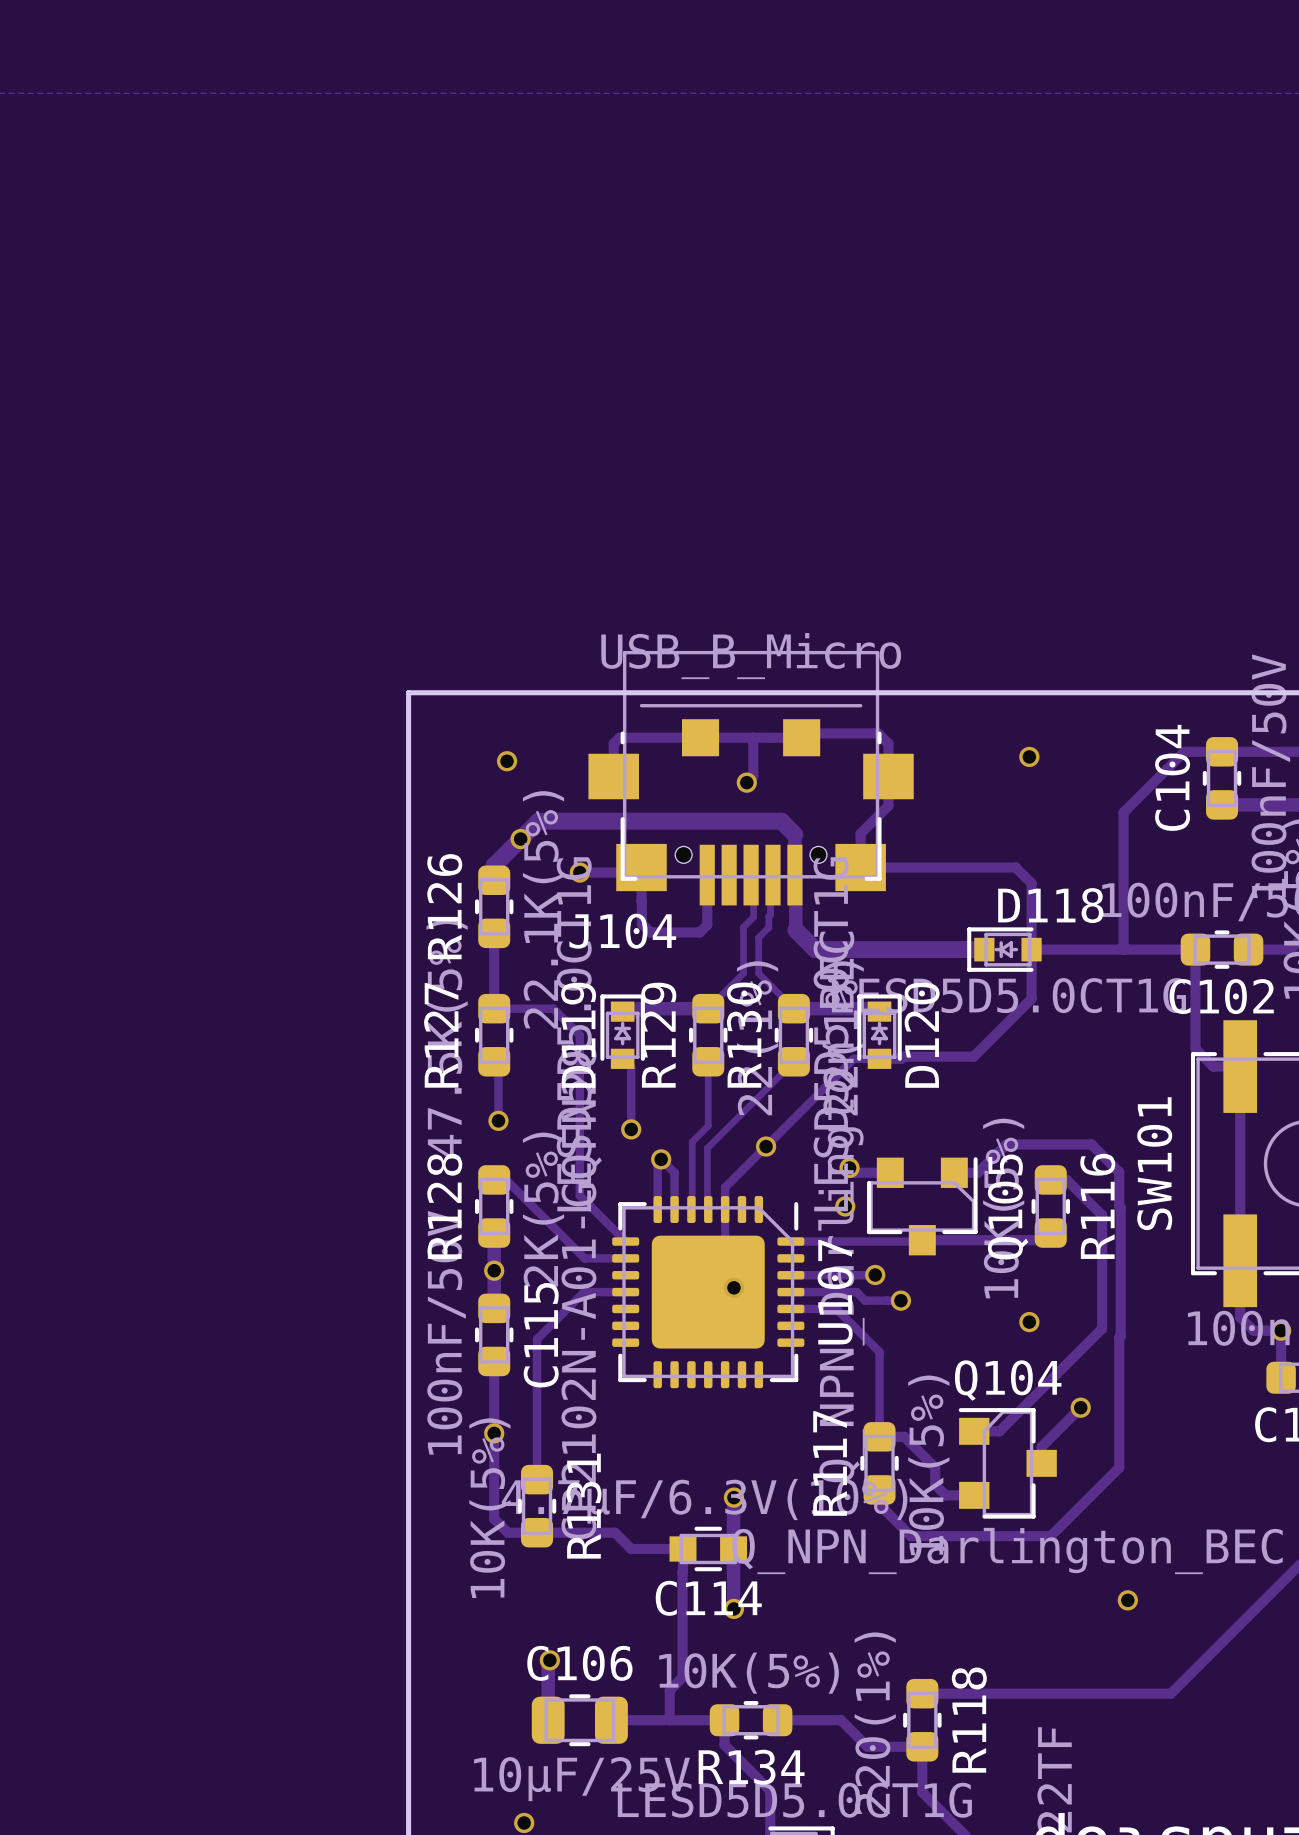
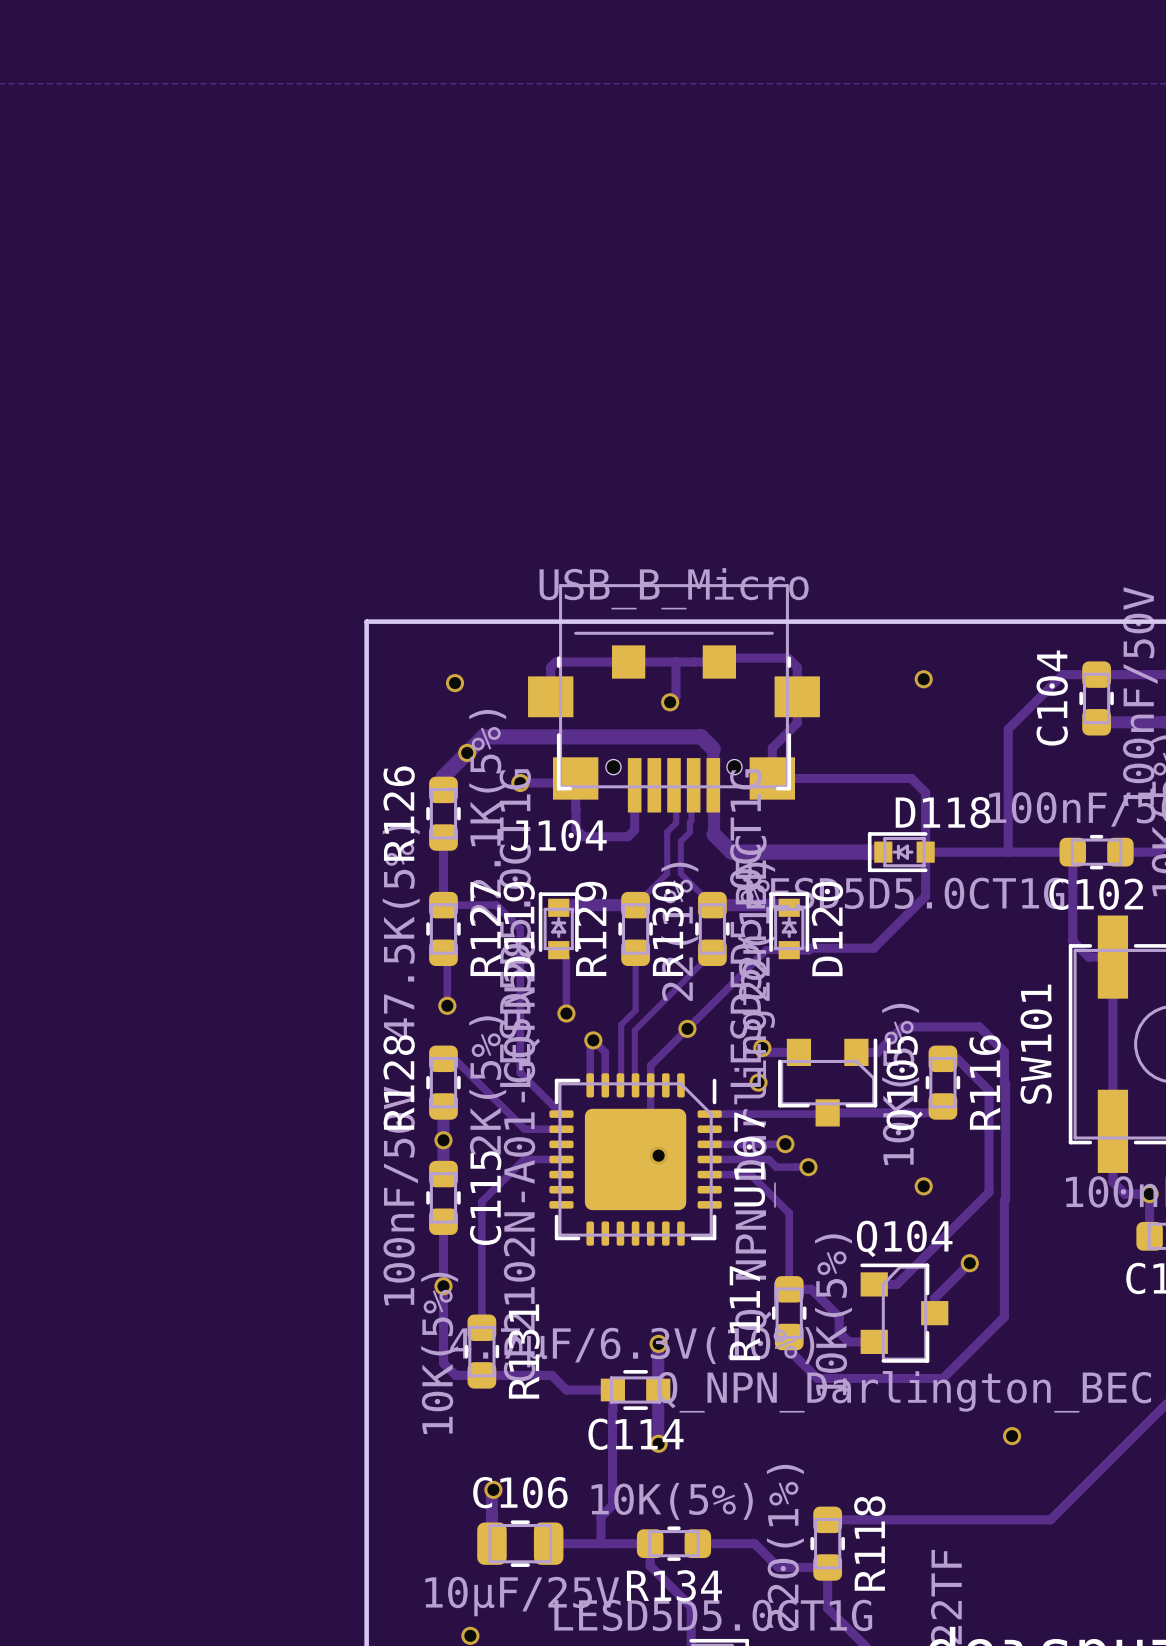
R127 name position: R127 (441, 1035) -> R127 (485, 929)

